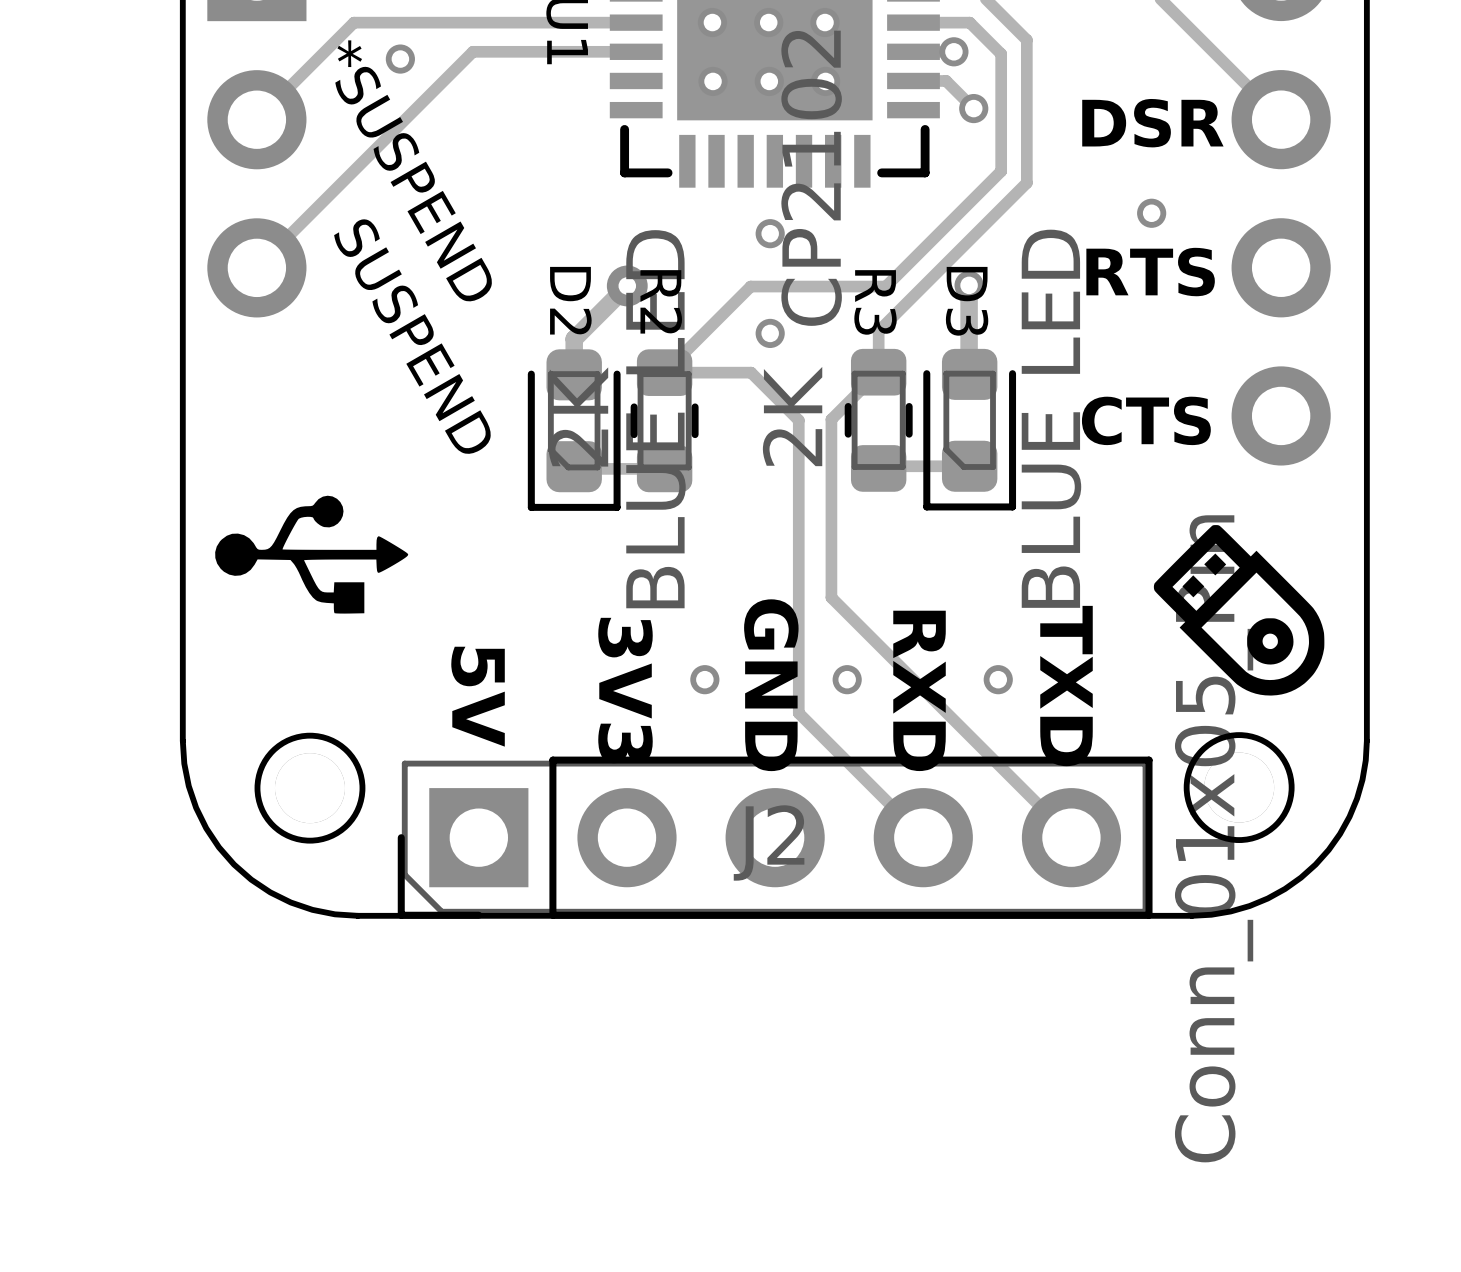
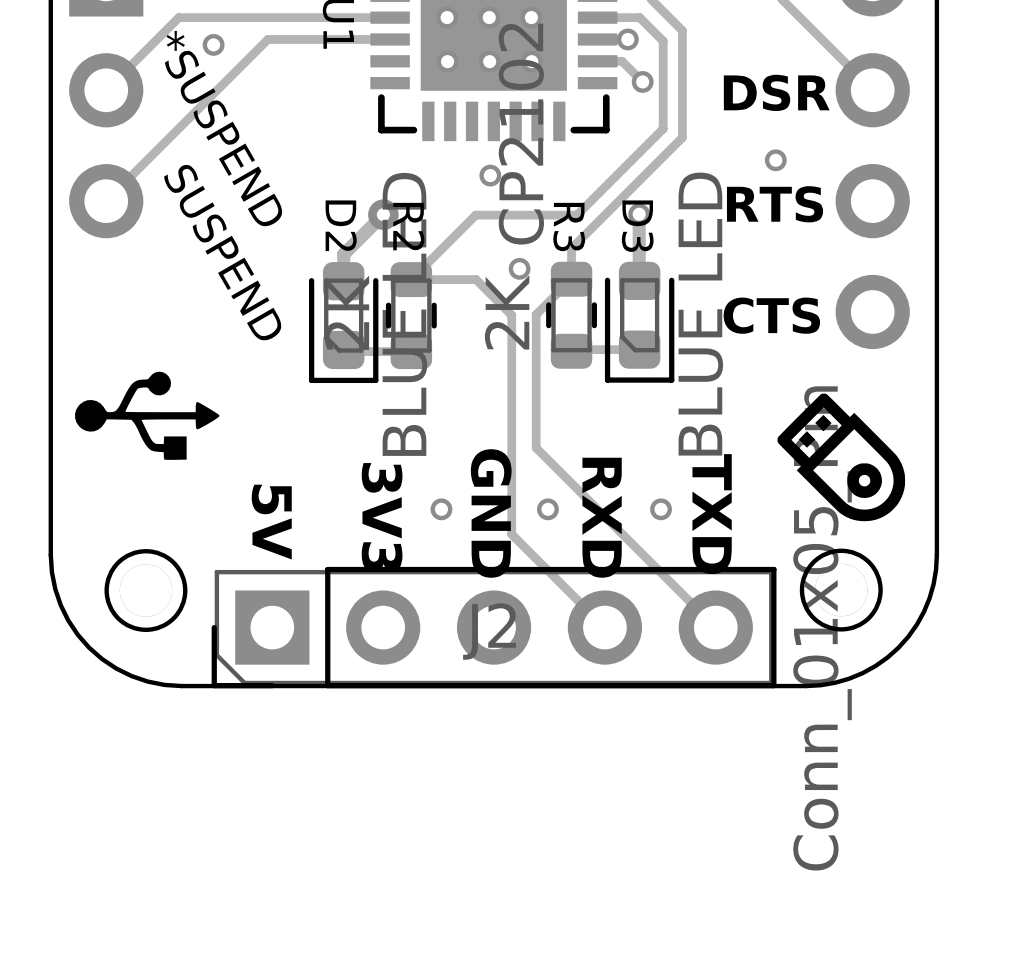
via position: (770, 333) -> (519, 268)

